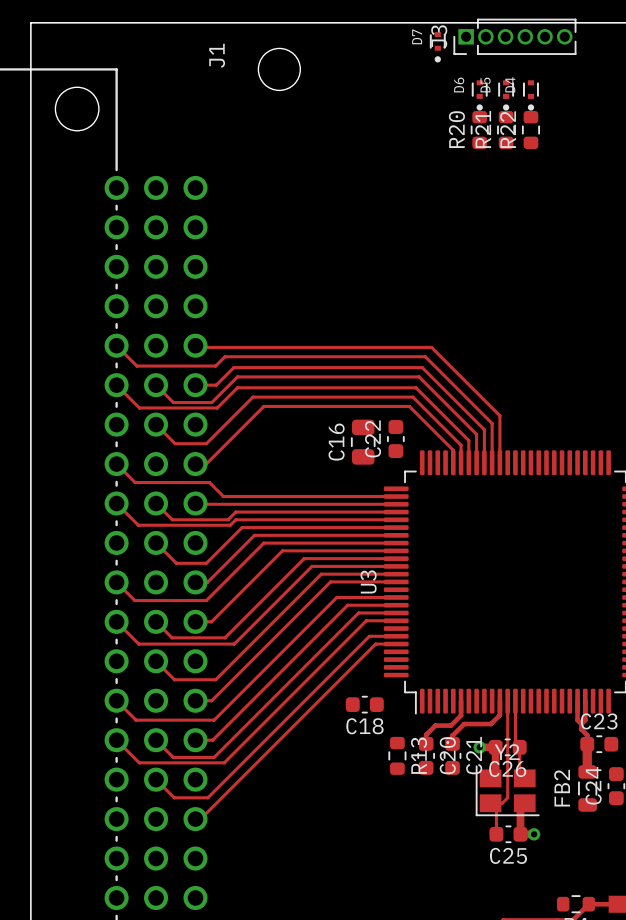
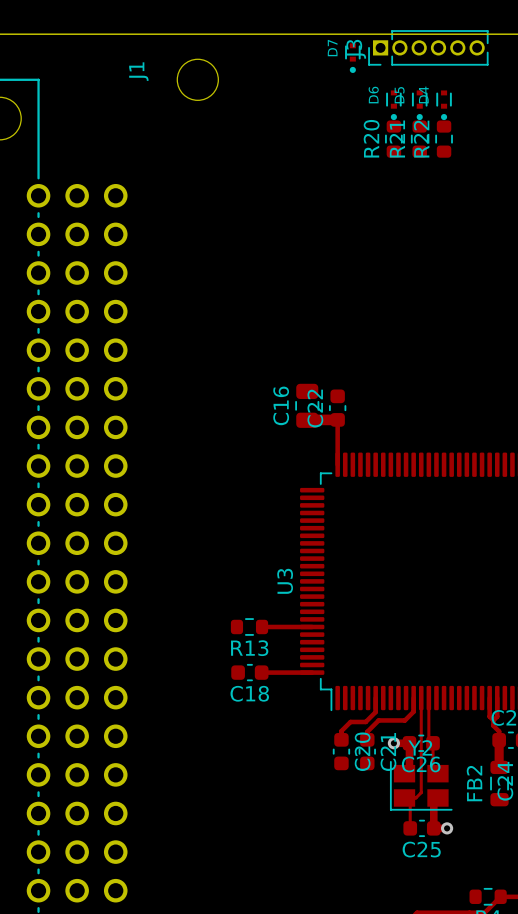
top track: (116, 345) (136, 366) (215, 366) (225, 356) (425, 356) (492, 423) (492, 462) -> none
top track: (195, 345) (197, 347) (431, 347) (499, 415) (499, 462) -> none
top track: (116, 385) (139, 407) (217, 407) (237, 387) (416, 387) (468, 440) (468, 462) -> none
top track: (156, 385) (173, 402) (211, 402) (237, 376) (419, 376) (476, 434) (476, 462) -> none
top track: (195, 385) (216, 385) (233, 367) (422, 367) (484, 429) (484, 462) -> none
top track: none -> (307, 420) (337, 419) (337, 464)
top track: (156, 424) (175, 443) (206, 443) (252, 397) (412, 397) (461, 445) (461, 462) -> none
C22 position: (395, 439) -> (337, 408)
C16 position: (363, 442) -> (307, 405)
top track: (453, 462) (453, 450) (409, 406) (263, 406) (206, 464) (195, 464) -> none
top track: (116, 464) (135, 482) (209, 482) (223, 496) (396, 496) -> none
top track: (116, 503) (138, 525) (230, 525) (235, 519) (396, 519) -> none
top track: (156, 503) (172, 519) (228, 519) (235, 512) (396, 512) -> none
top track: (195, 503) (396, 504) -> none
top track: (396, 527) (242, 527) (206, 563) (176, 563) (156, 542) -> none
top track: (396, 535) (254, 535) (207, 582) (195, 582) -> none
top track: (396, 543) (263, 543) (206, 600) (134, 600) (116, 582) -> none
top track: (396, 550) (282, 550) (211, 621) (195, 621) -> none
top track: (396, 558) (304, 558) (225, 637) (172, 637) (156, 621) -> none
top track: (396, 566) (311, 566) (234, 644) (138, 644) (116, 621) -> none
top track: (396, 574) (321, 574) (215, 679) (174, 679) (156, 661) -> none
top track: (396, 581) (330, 581) (211, 700) (195, 700) -> none
top track: (396, 597) (336, 597) (214, 720) (136, 720) (116, 700) -> none
top track: (396, 605) (347, 605) (212, 740) (195, 740) -> none
top track: (396, 613) (358, 613) (214, 757) (173, 757) (156, 740) -> none
top track: (396, 620) (366, 620) (224, 762) (139, 762) (116, 740) -> none
top track: none -> (262, 626) (312, 626)
top track: (396, 636) (369, 636) (207, 797) (174, 797) (156, 779) -> none
top track: (396, 644) (375, 644) (200, 819) (195, 819) -> none
top track: none -> (261, 672) (312, 672)
C18 position: (364, 704) -> (249, 672)
R13 rotation: 0° (397, 755) -> 90° clockwise (249, 626)
R13 position: (397, 755) -> (249, 626)

